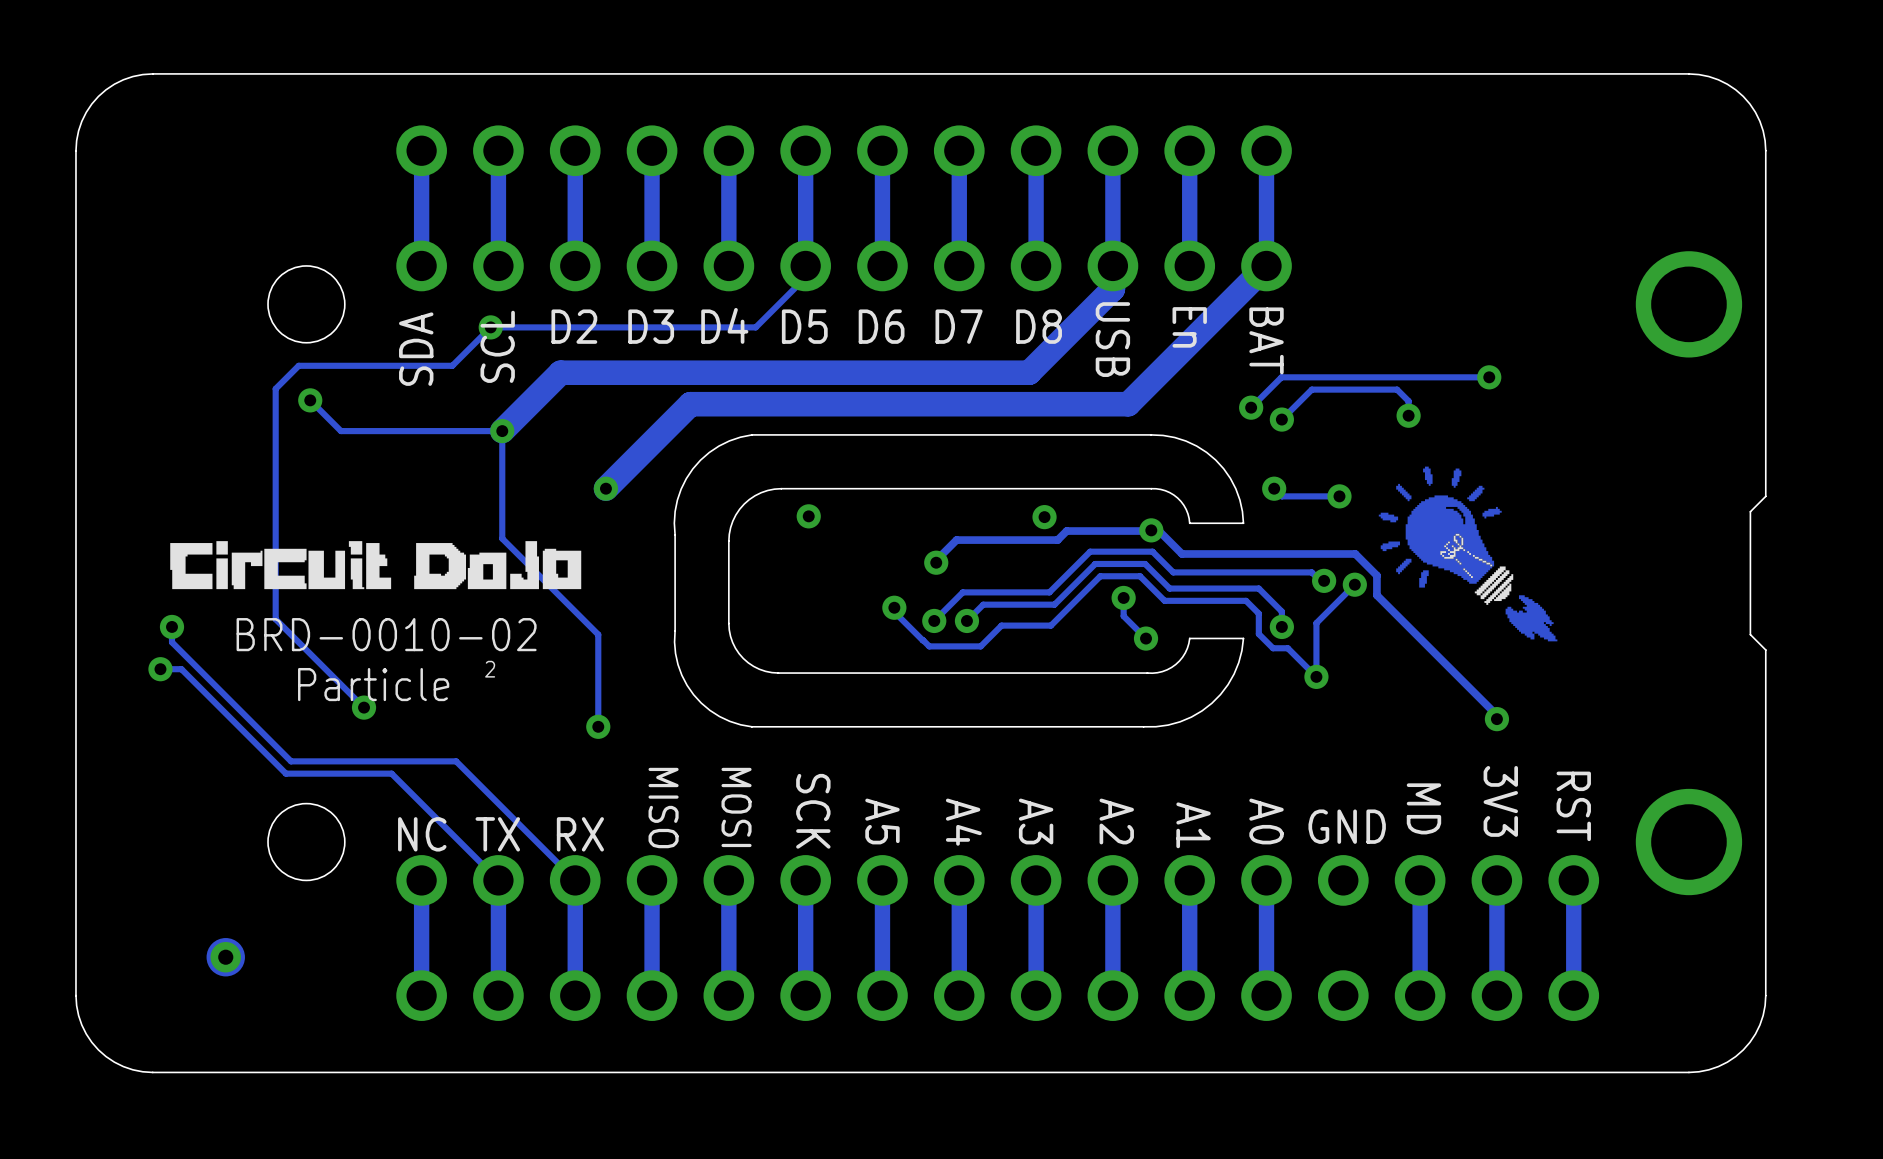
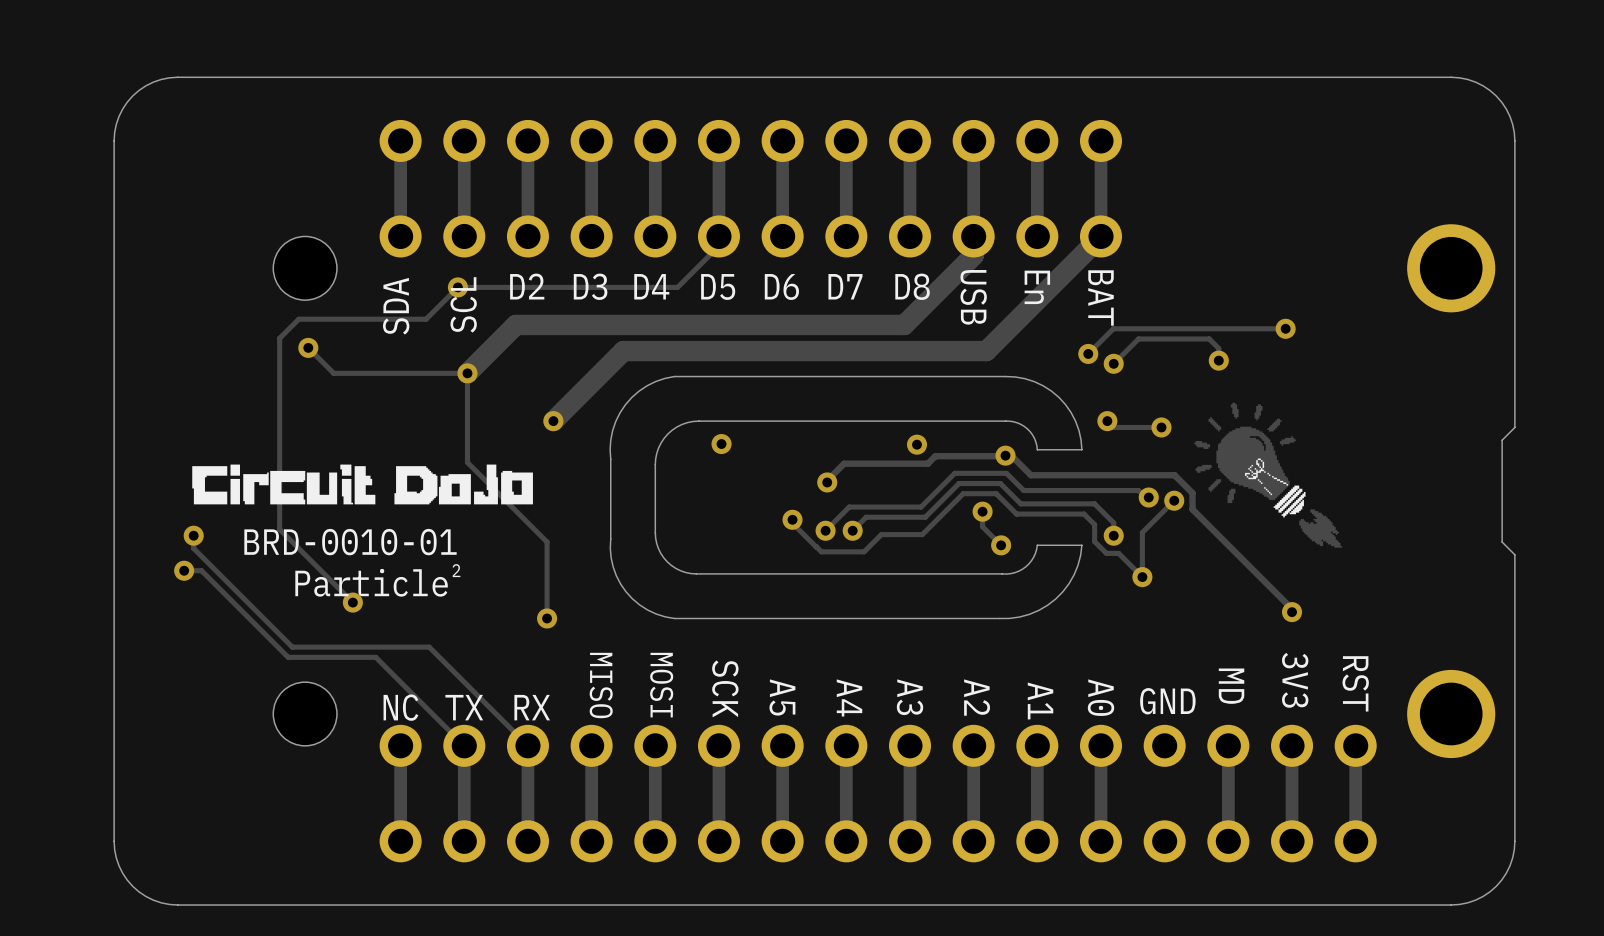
text: BRD-0010-02 (386, 634) -> BRD-0010-01 (350, 542)
part: (225, 957) -> none

